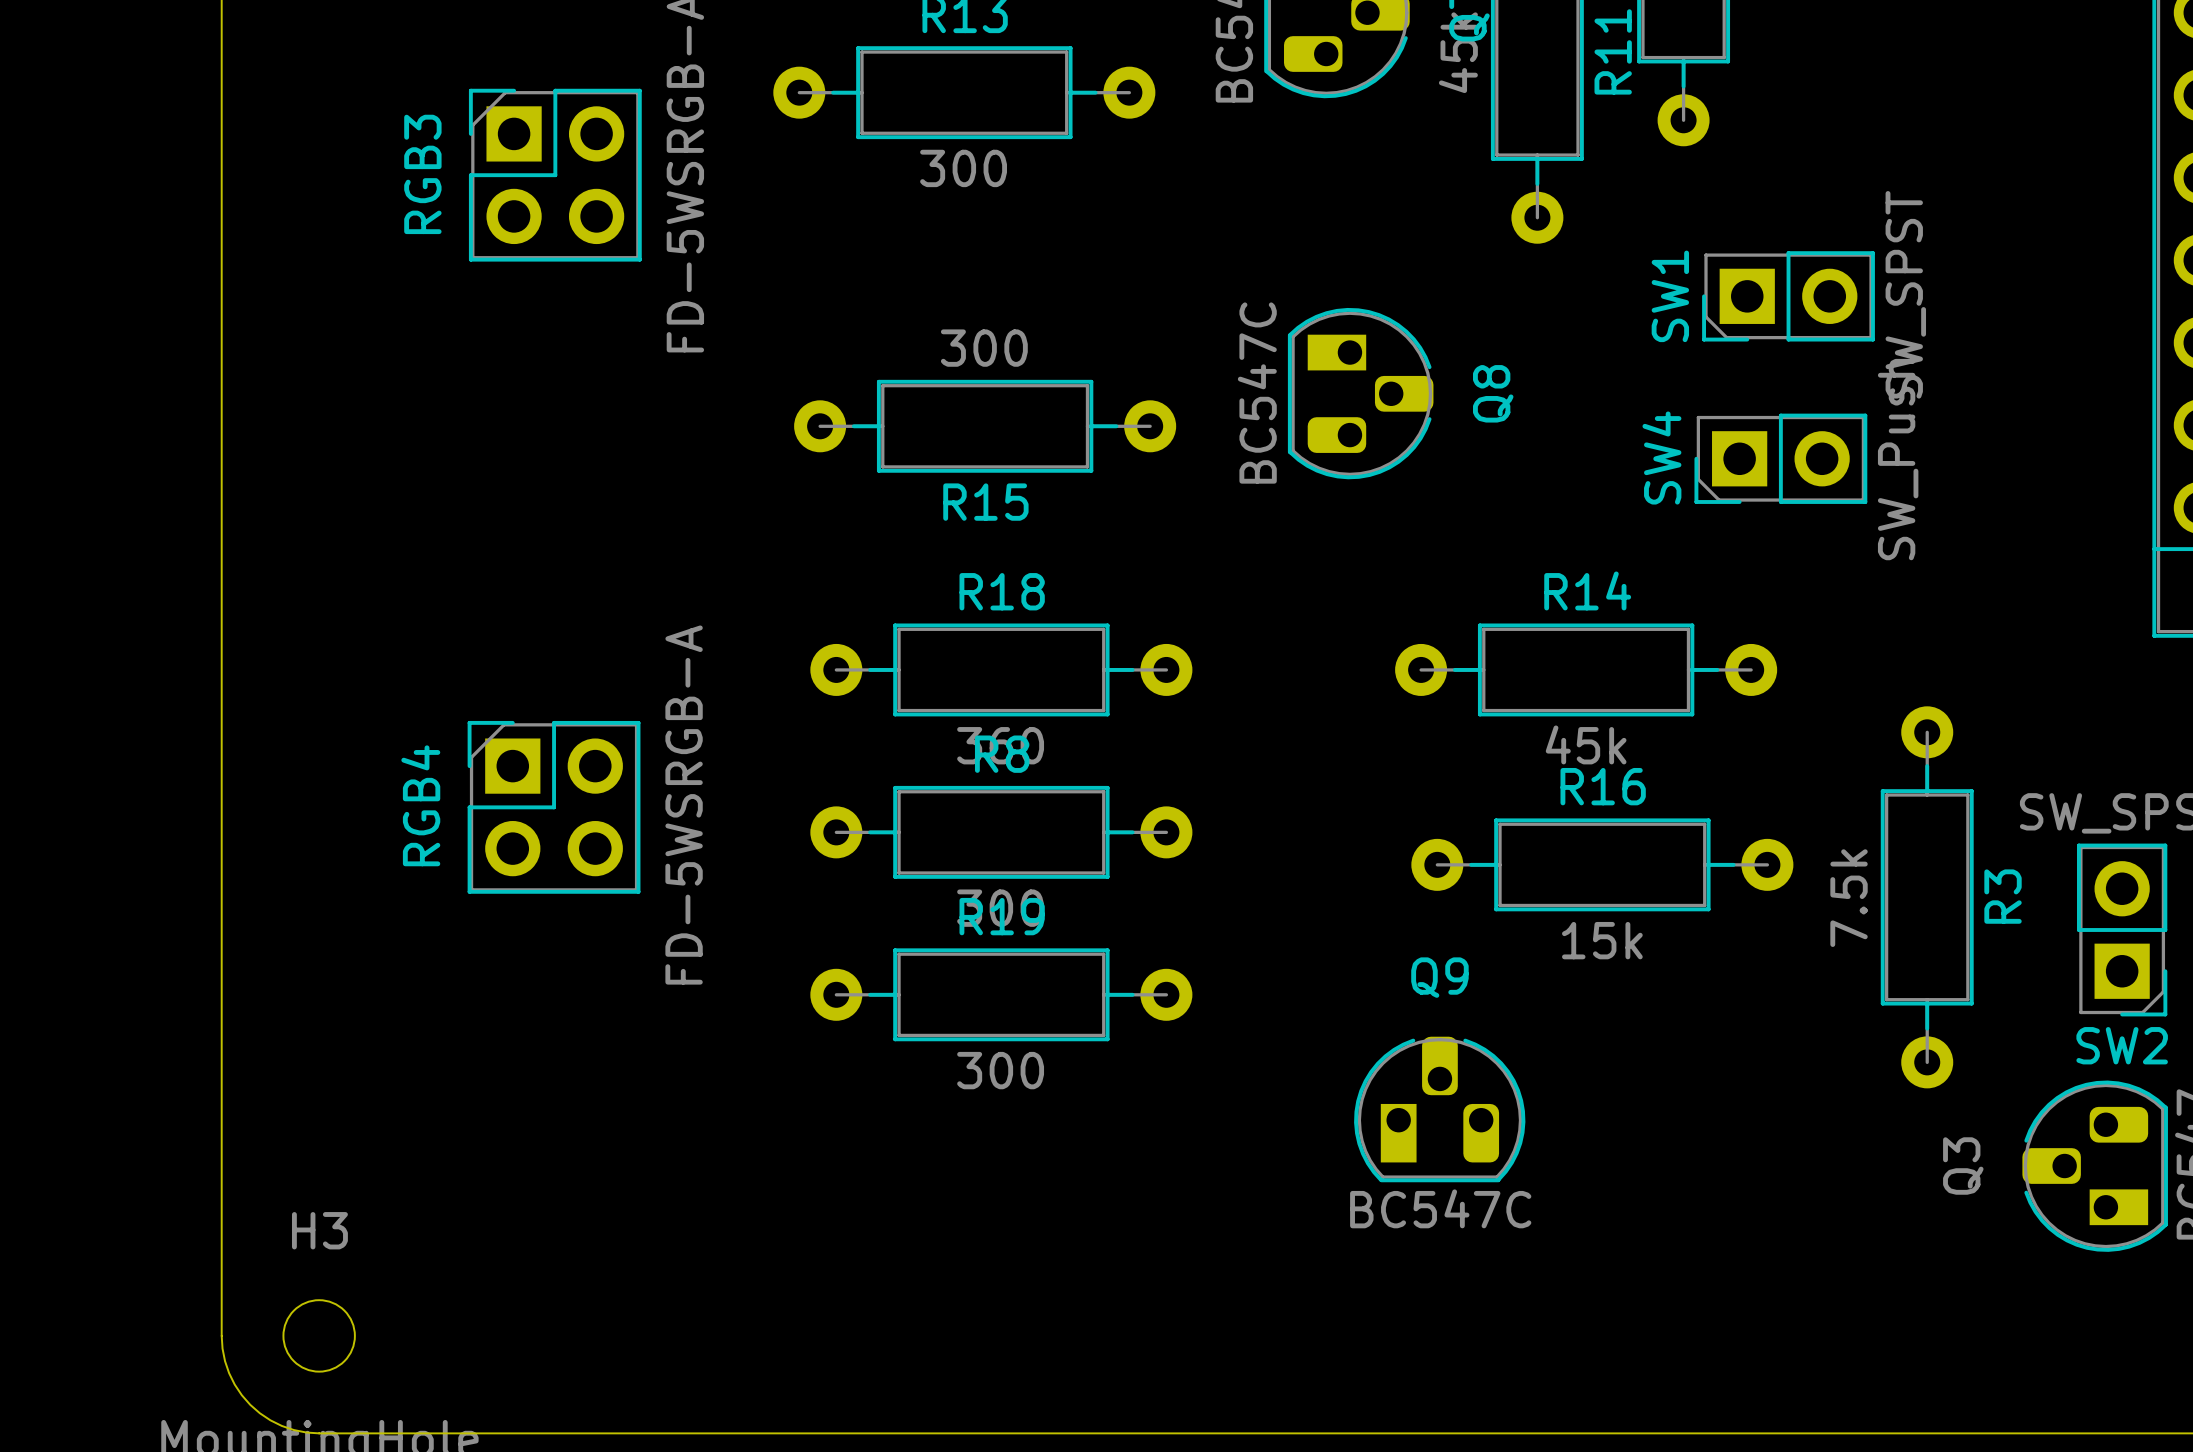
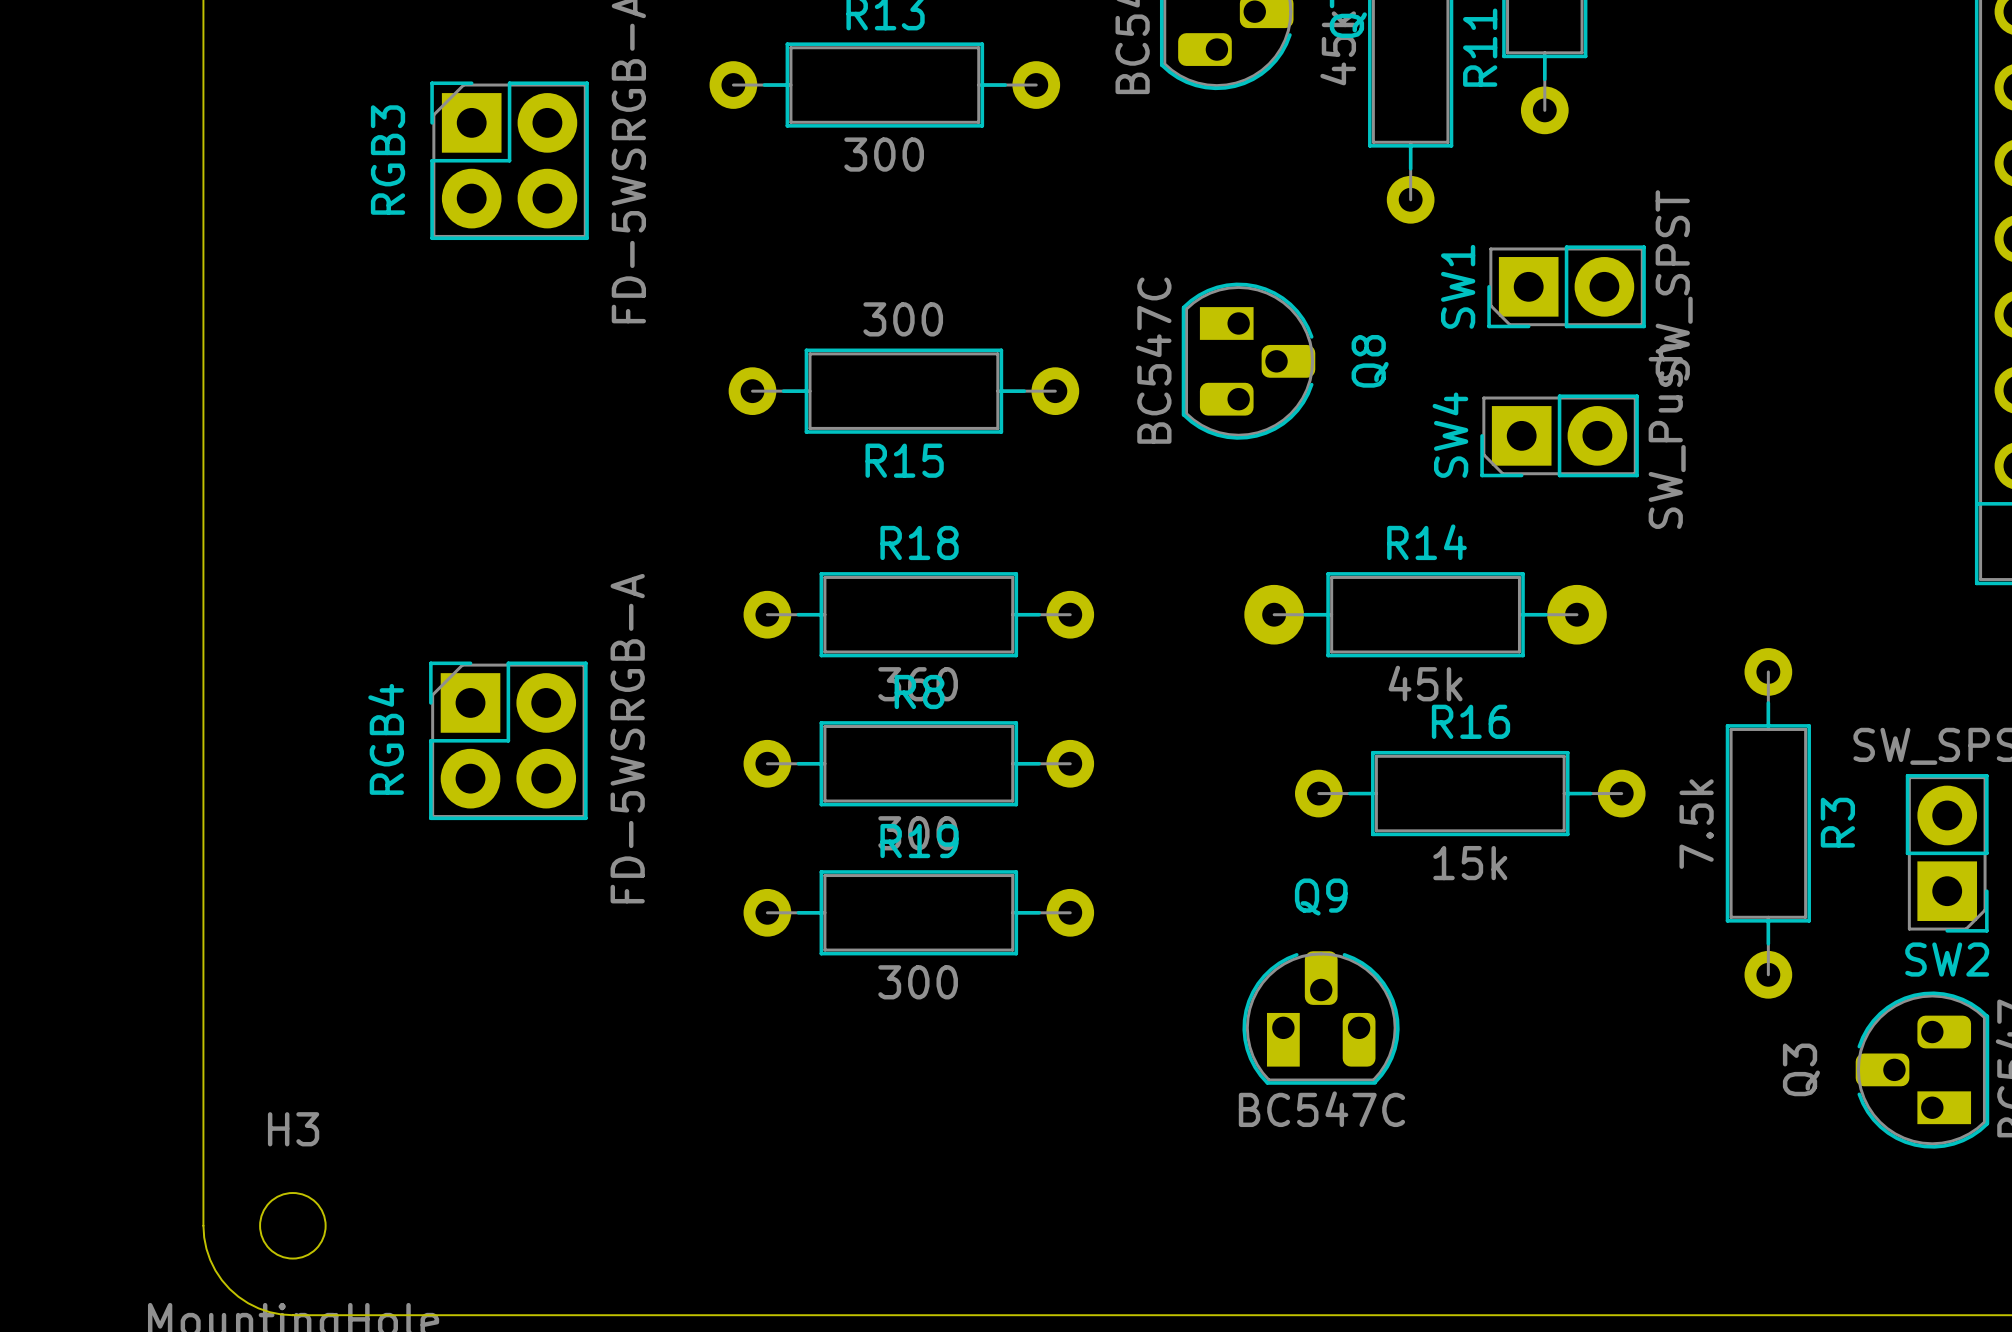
RGB3 footprint: [468, 88, 642, 262] -> [430, 81, 589, 241]
SW1 footprint: [1702, 251, 1875, 342] -> [1487, 245, 1646, 329]
SW4 footprint: [1694, 413, 1868, 504] -> [1480, 394, 1639, 478]
R14 footprint: [1395, 623, 1778, 717] -> [1244, 572, 1607, 658]
RGB4 footprint: [467, 720, 641, 894] -> [429, 661, 588, 821]
SW2 footprint: [2076, 843, 2168, 1017] -> [1905, 774, 1989, 933]

